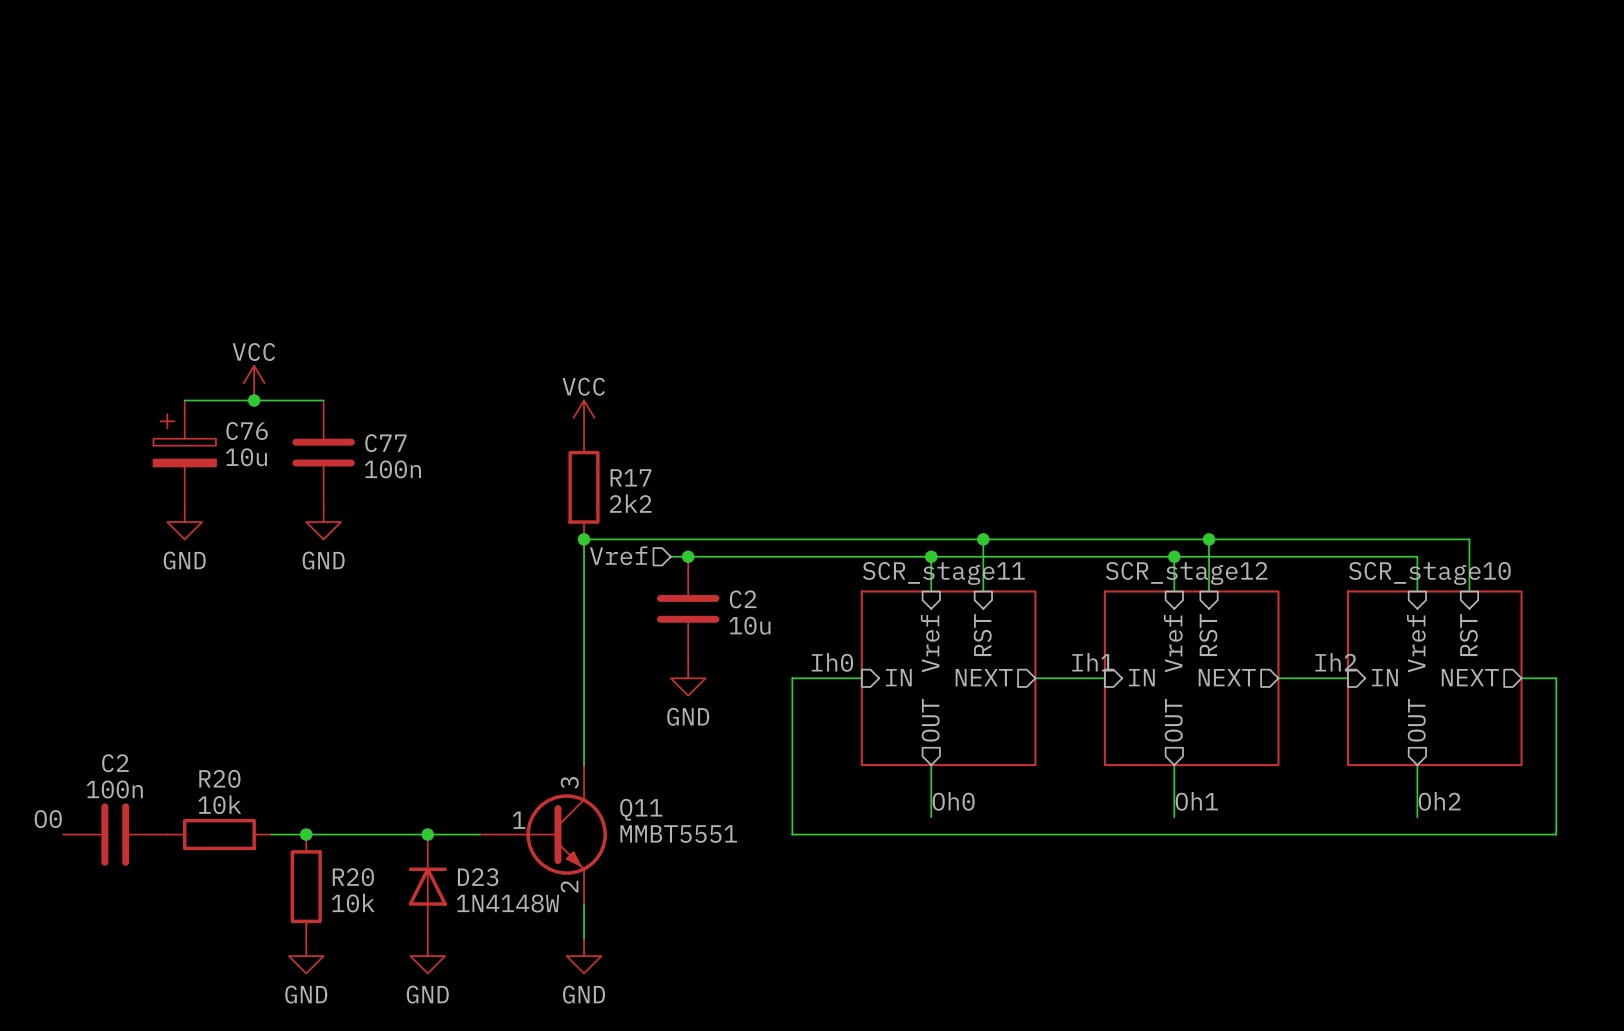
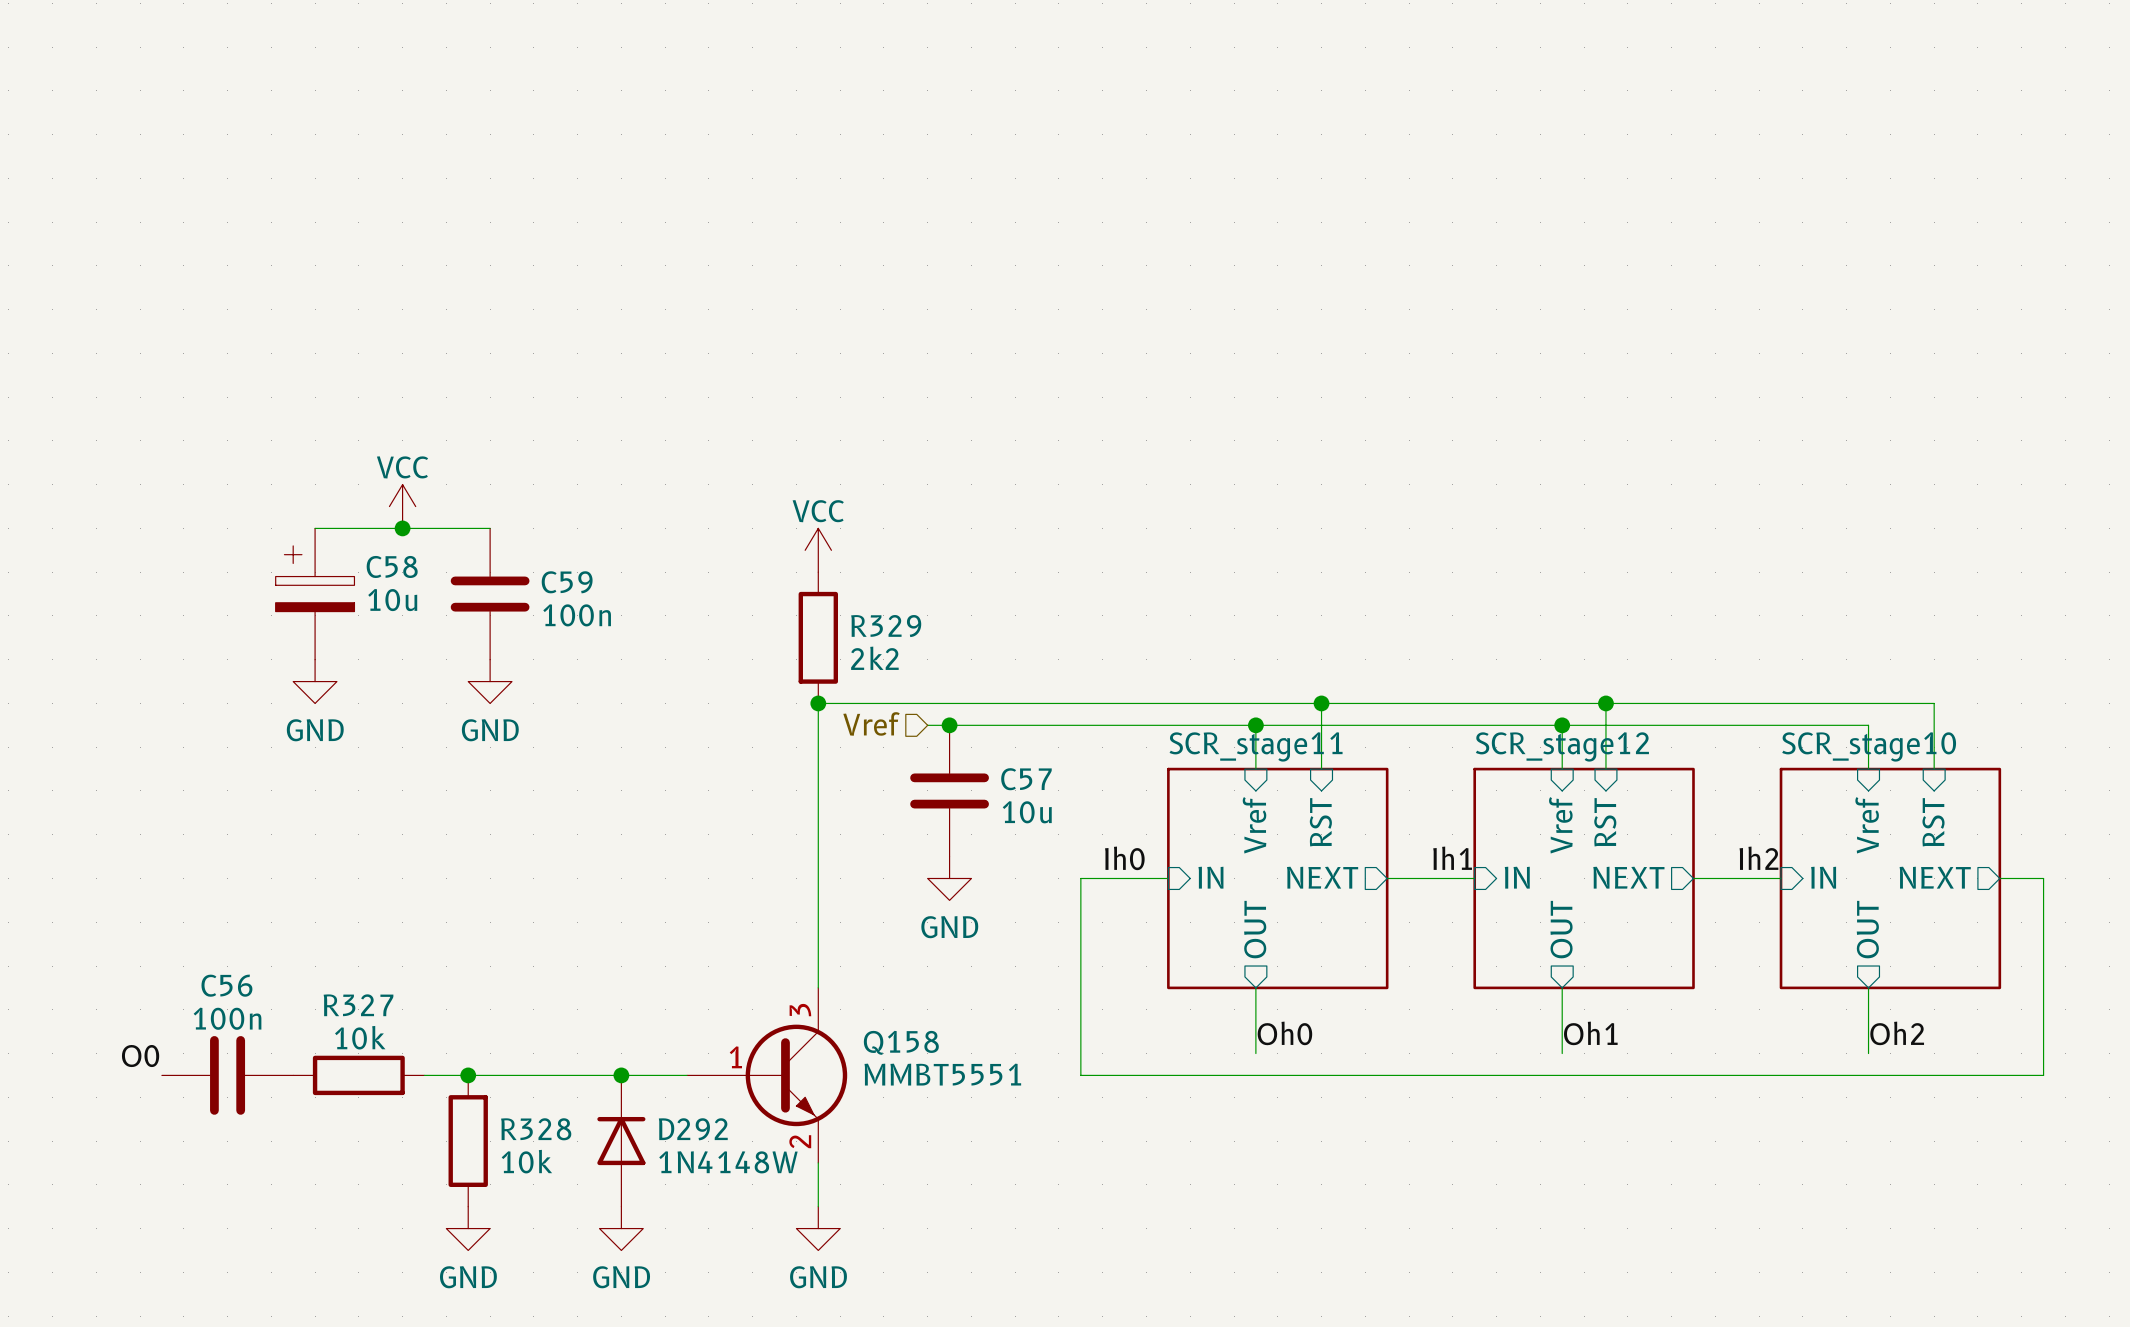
C76 name: C76 (247, 431) -> C58 (392, 566)
C77 name: C77 (385, 443) -> C59 (567, 582)
R17 name: R17 (630, 477) -> R329 (886, 626)
C2 name: C2 (743, 599) -> C57 (1026, 779)
C2 name: C2 (115, 763) -> C56 (226, 985)
R20 name: R20 (219, 778) -> R327 (358, 1005)
Q11 name: Q11 (641, 809) -> Q158 (901, 1042)
R20 name: R20 (353, 877) -> R328 (536, 1129)
D23 name: D23 (478, 877) -> D292 (693, 1129)

